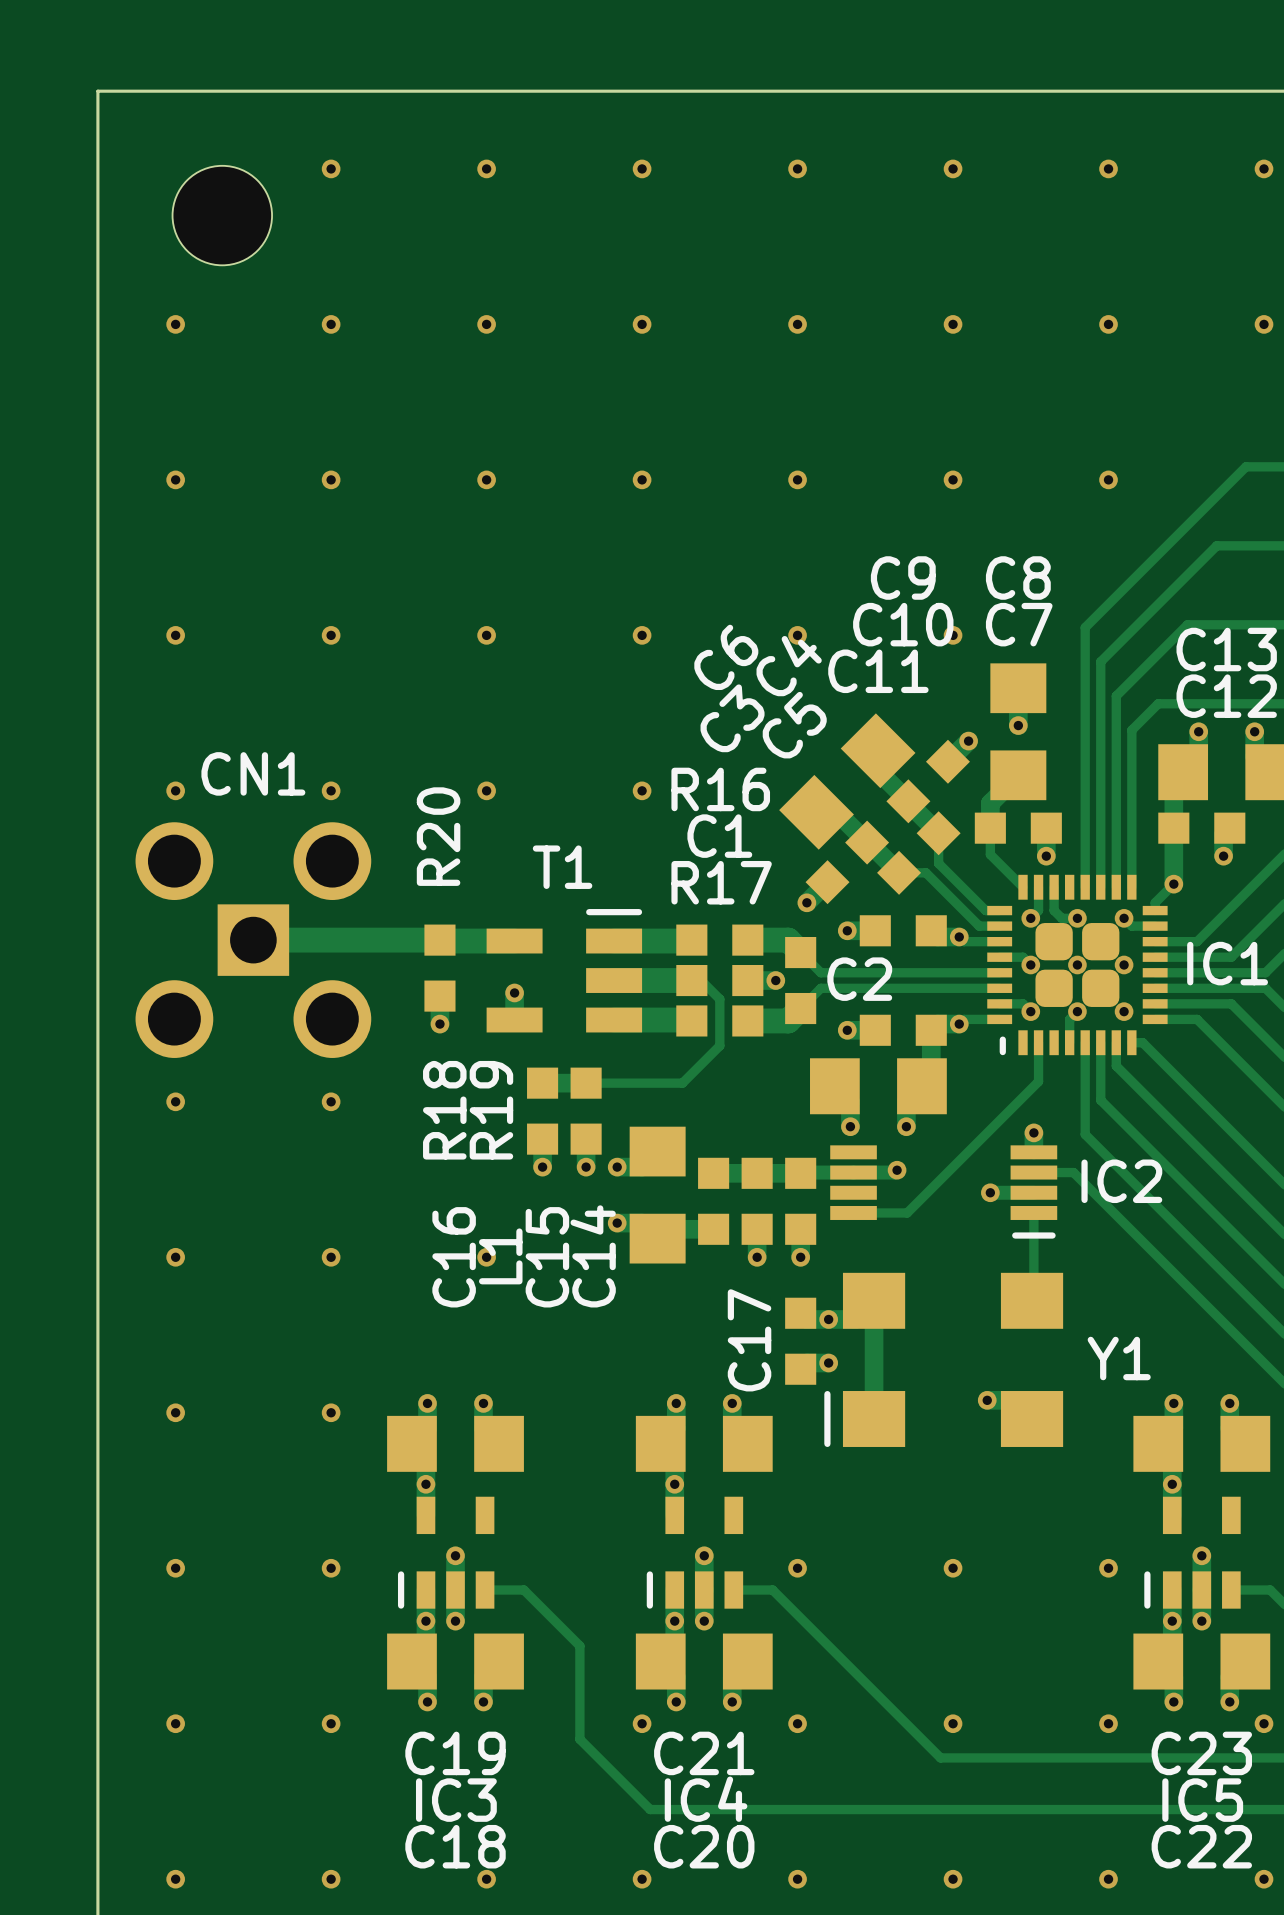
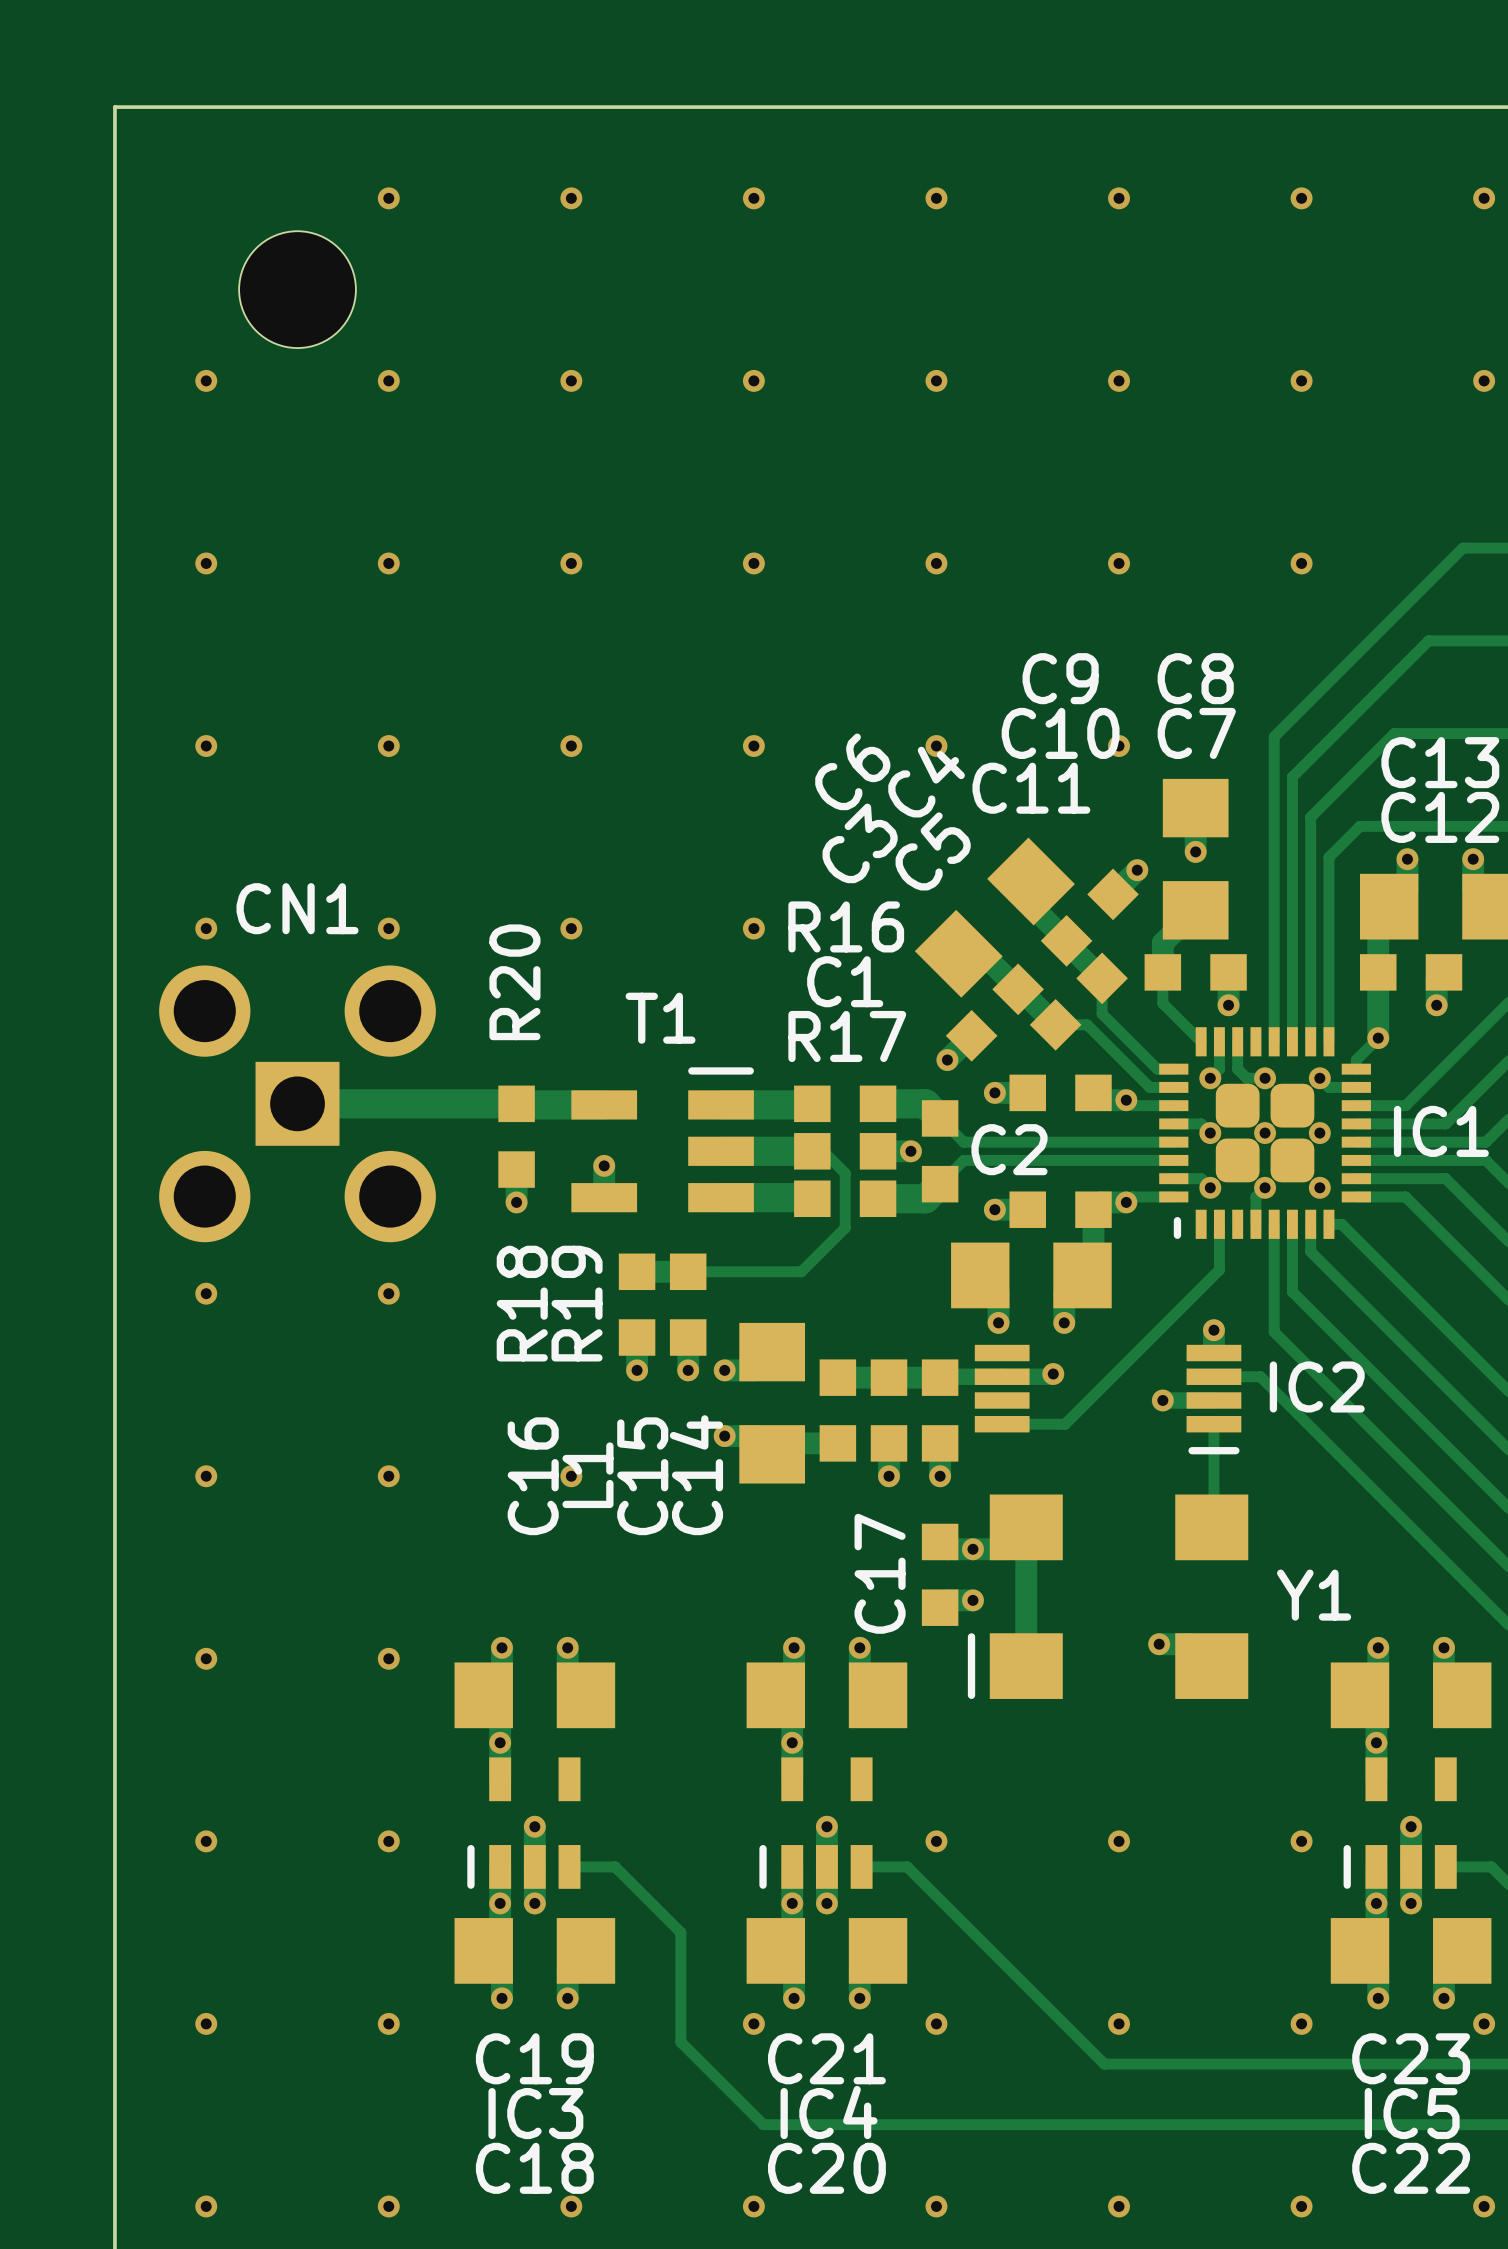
part position: (222, 215) -> (297, 289)

